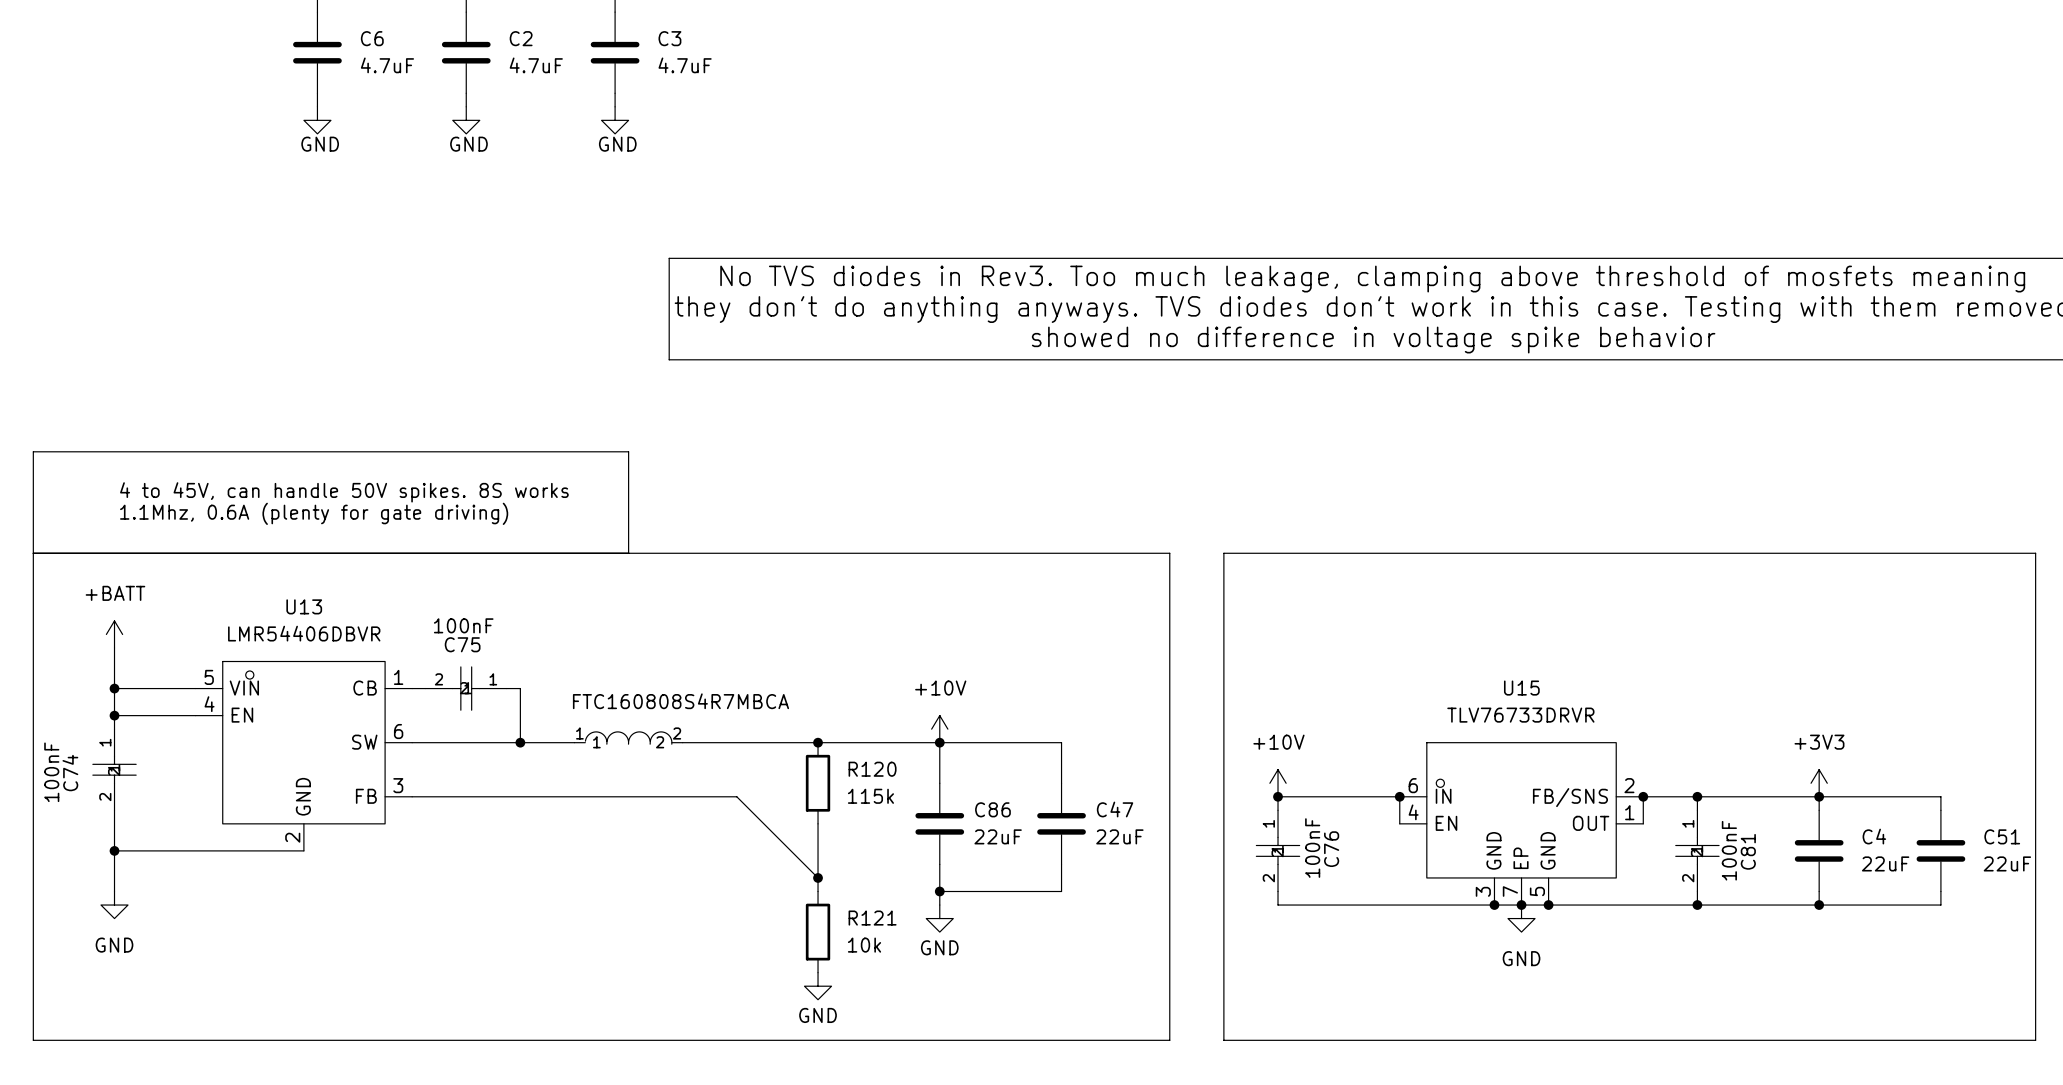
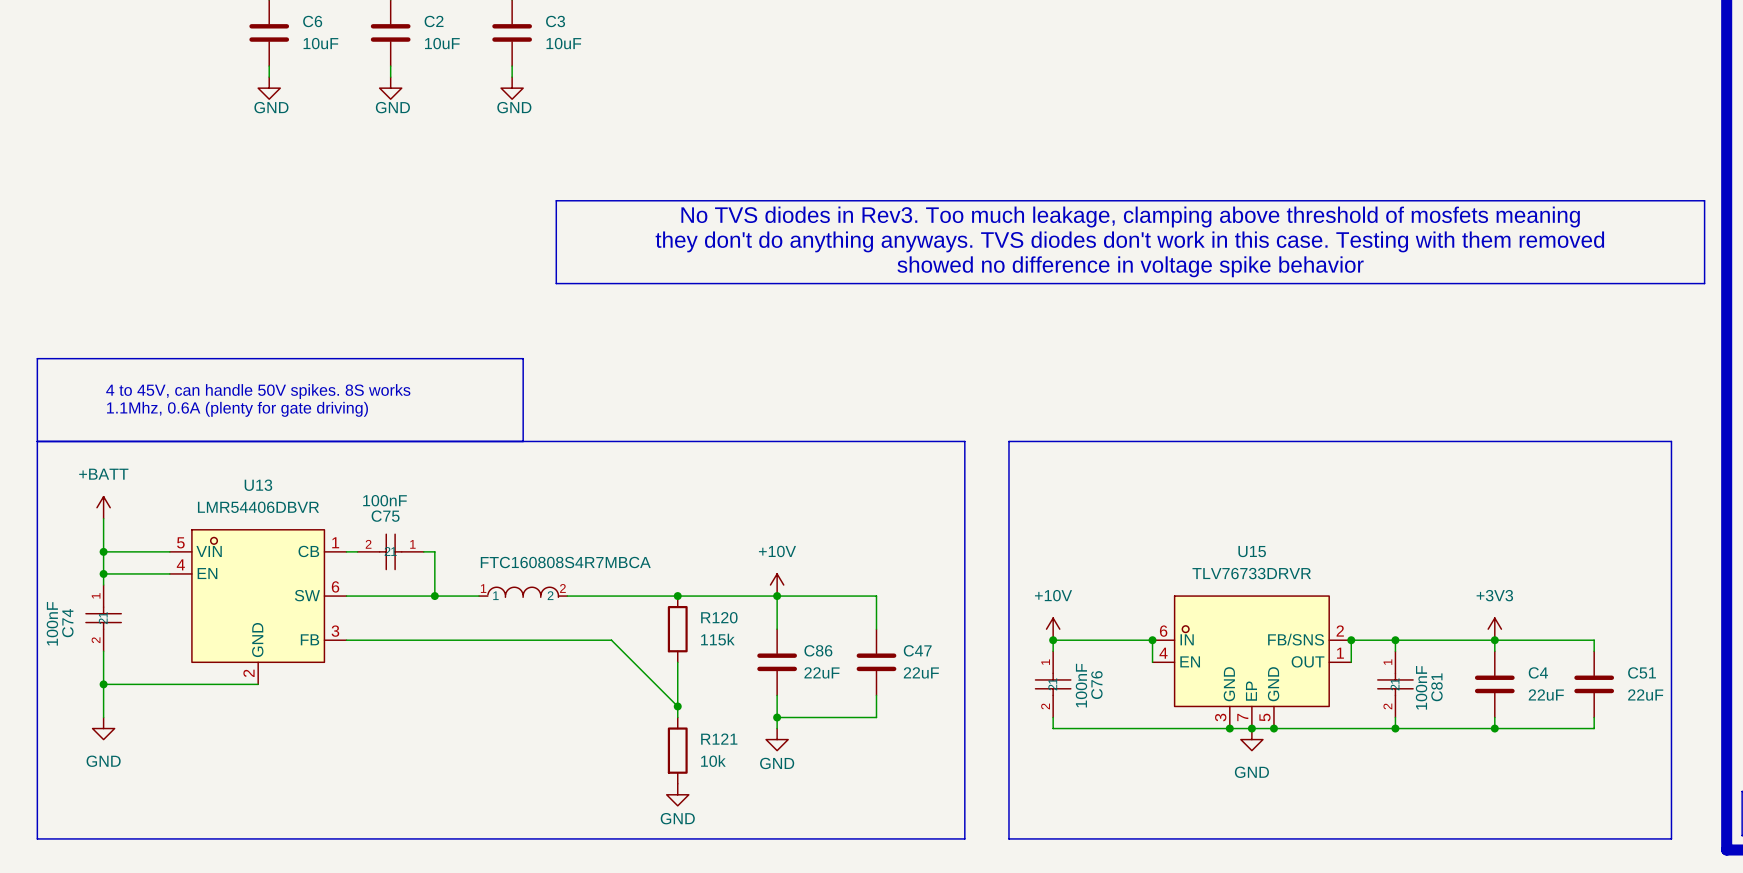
C6 value: 4.7uF (387, 65) -> 10uF (320, 43)
C2 value: 4.7uF (536, 65) -> 10uF (442, 43)
C3 value: 4.7uF (685, 65) -> 10uF (563, 43)

